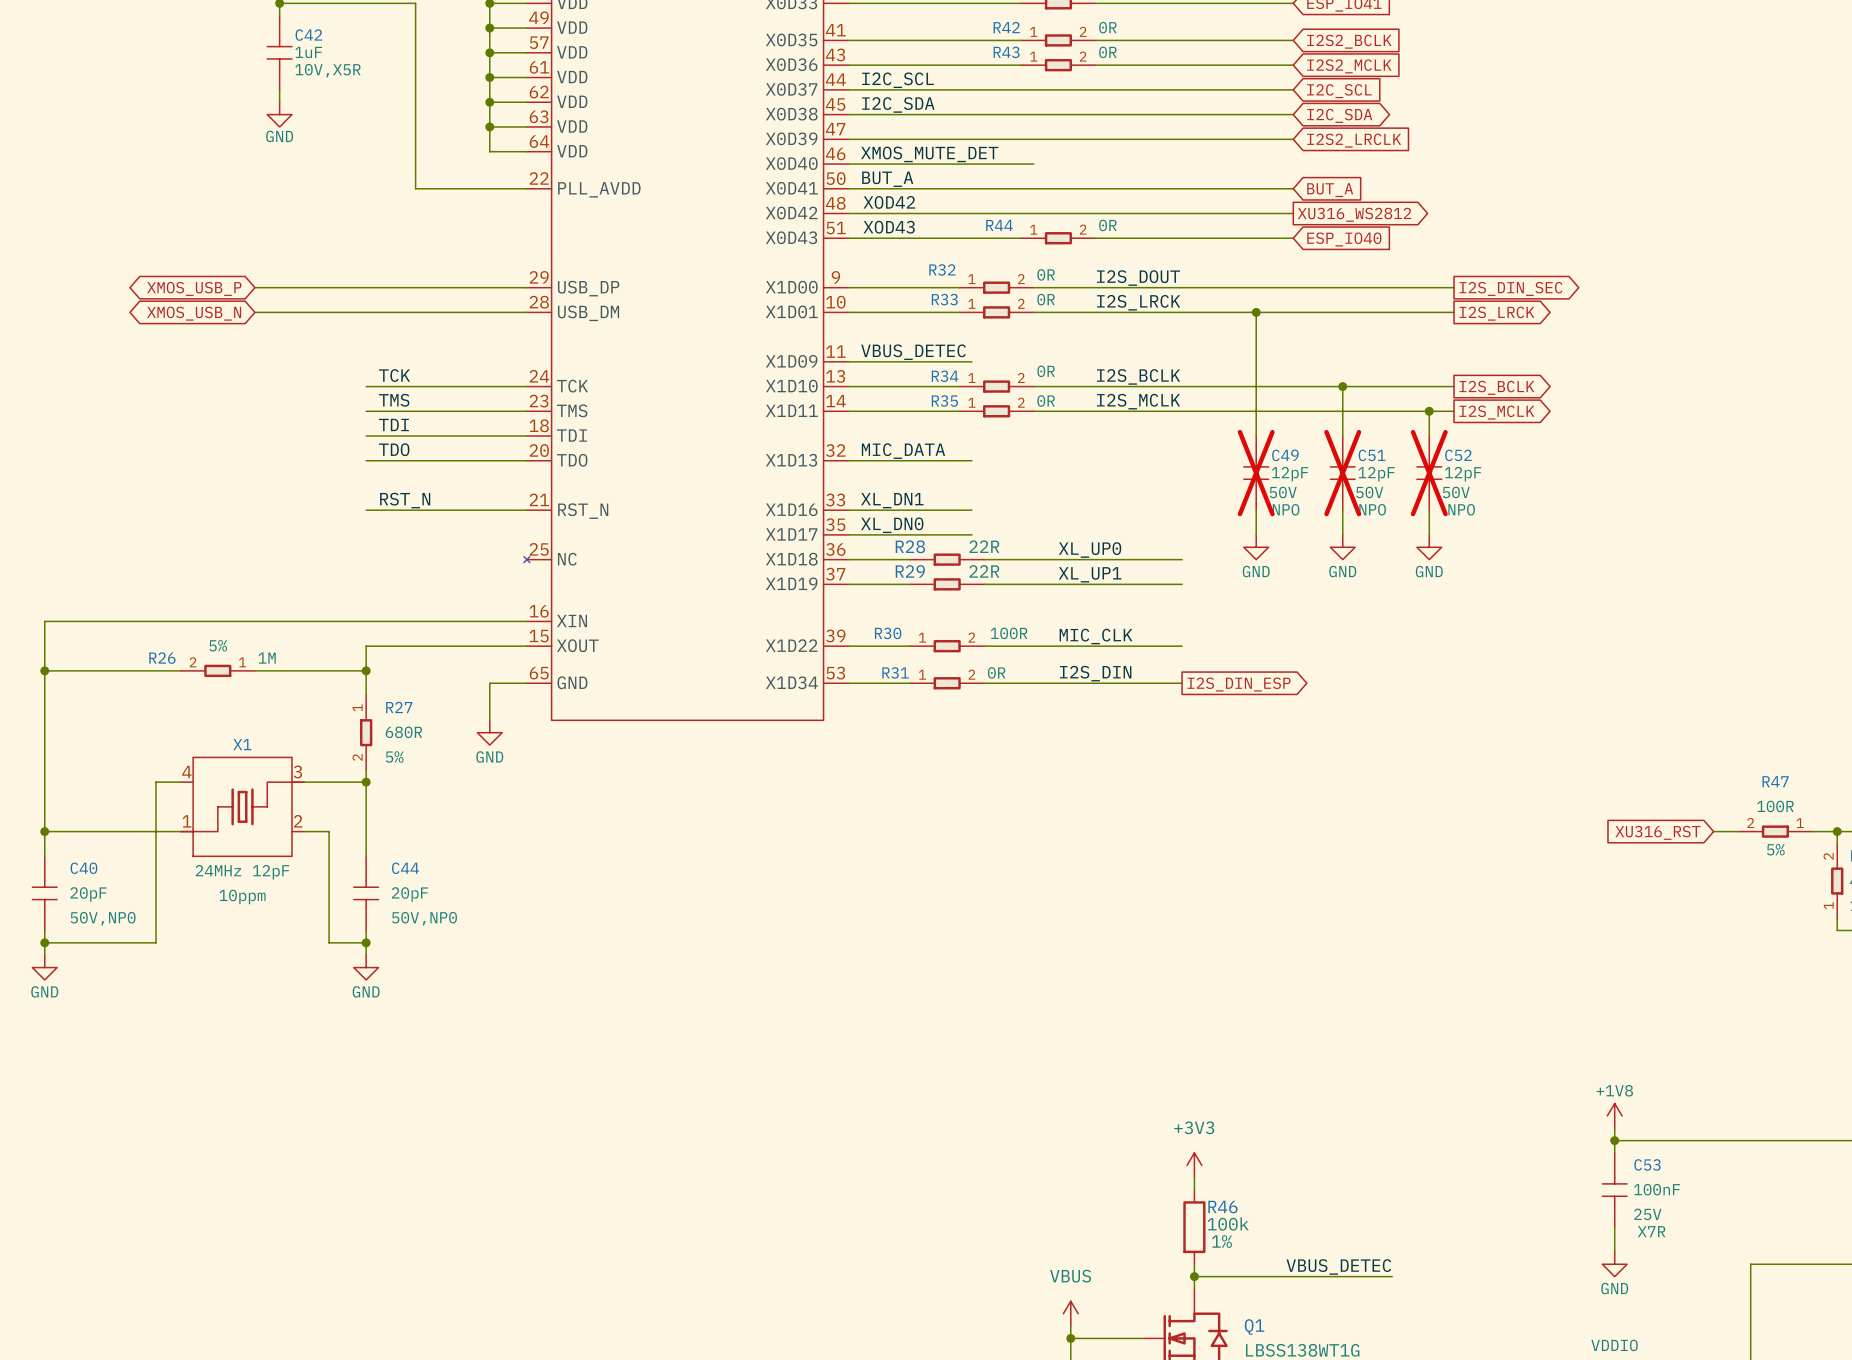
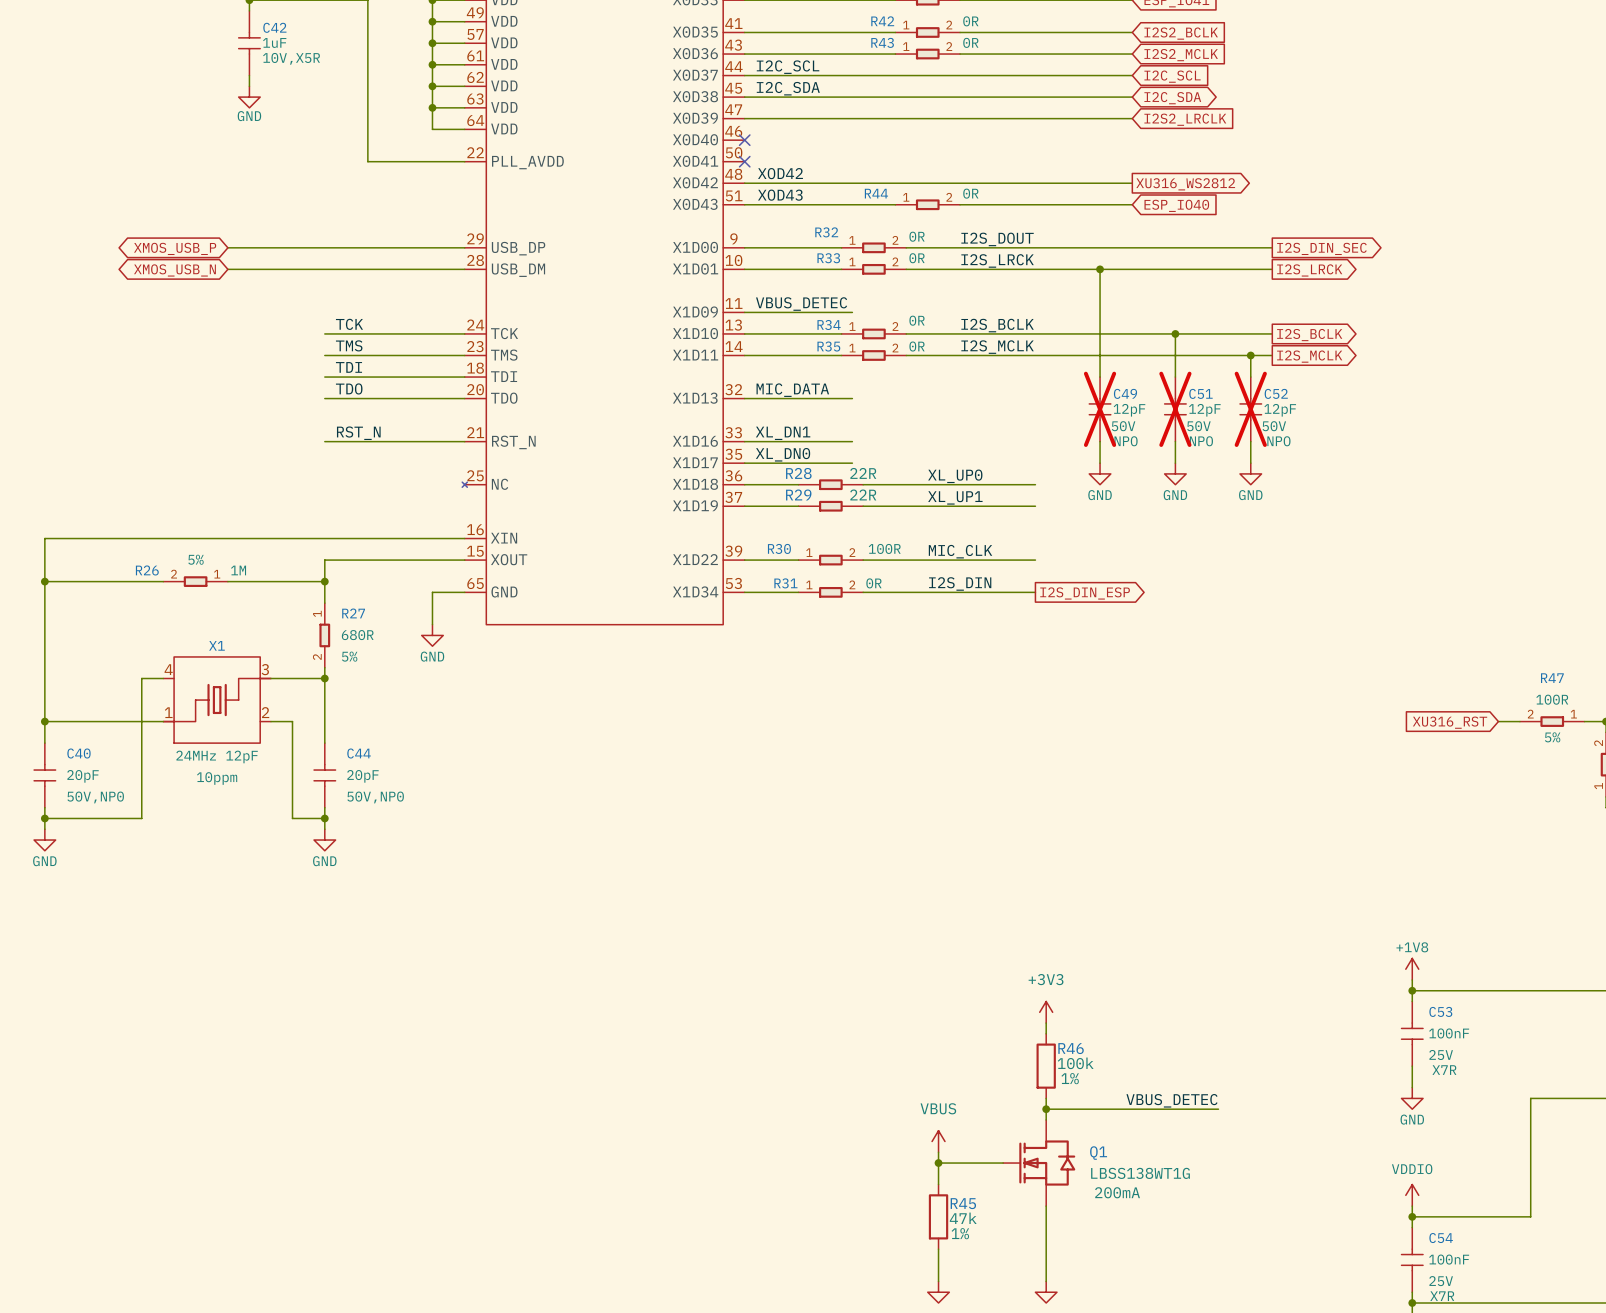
label: XMOS_MUTE_DET (929, 154) -> none
wire: (848, 164) (1033, 164) -> none
no-connect mark: none -> (744, 140)
label: BUT_A (887, 179) -> none
wire: (848, 188) (1293, 188) -> none
no-connect mark: none -> (744, 161)
global label: BUT_A (1330, 190) -> none

